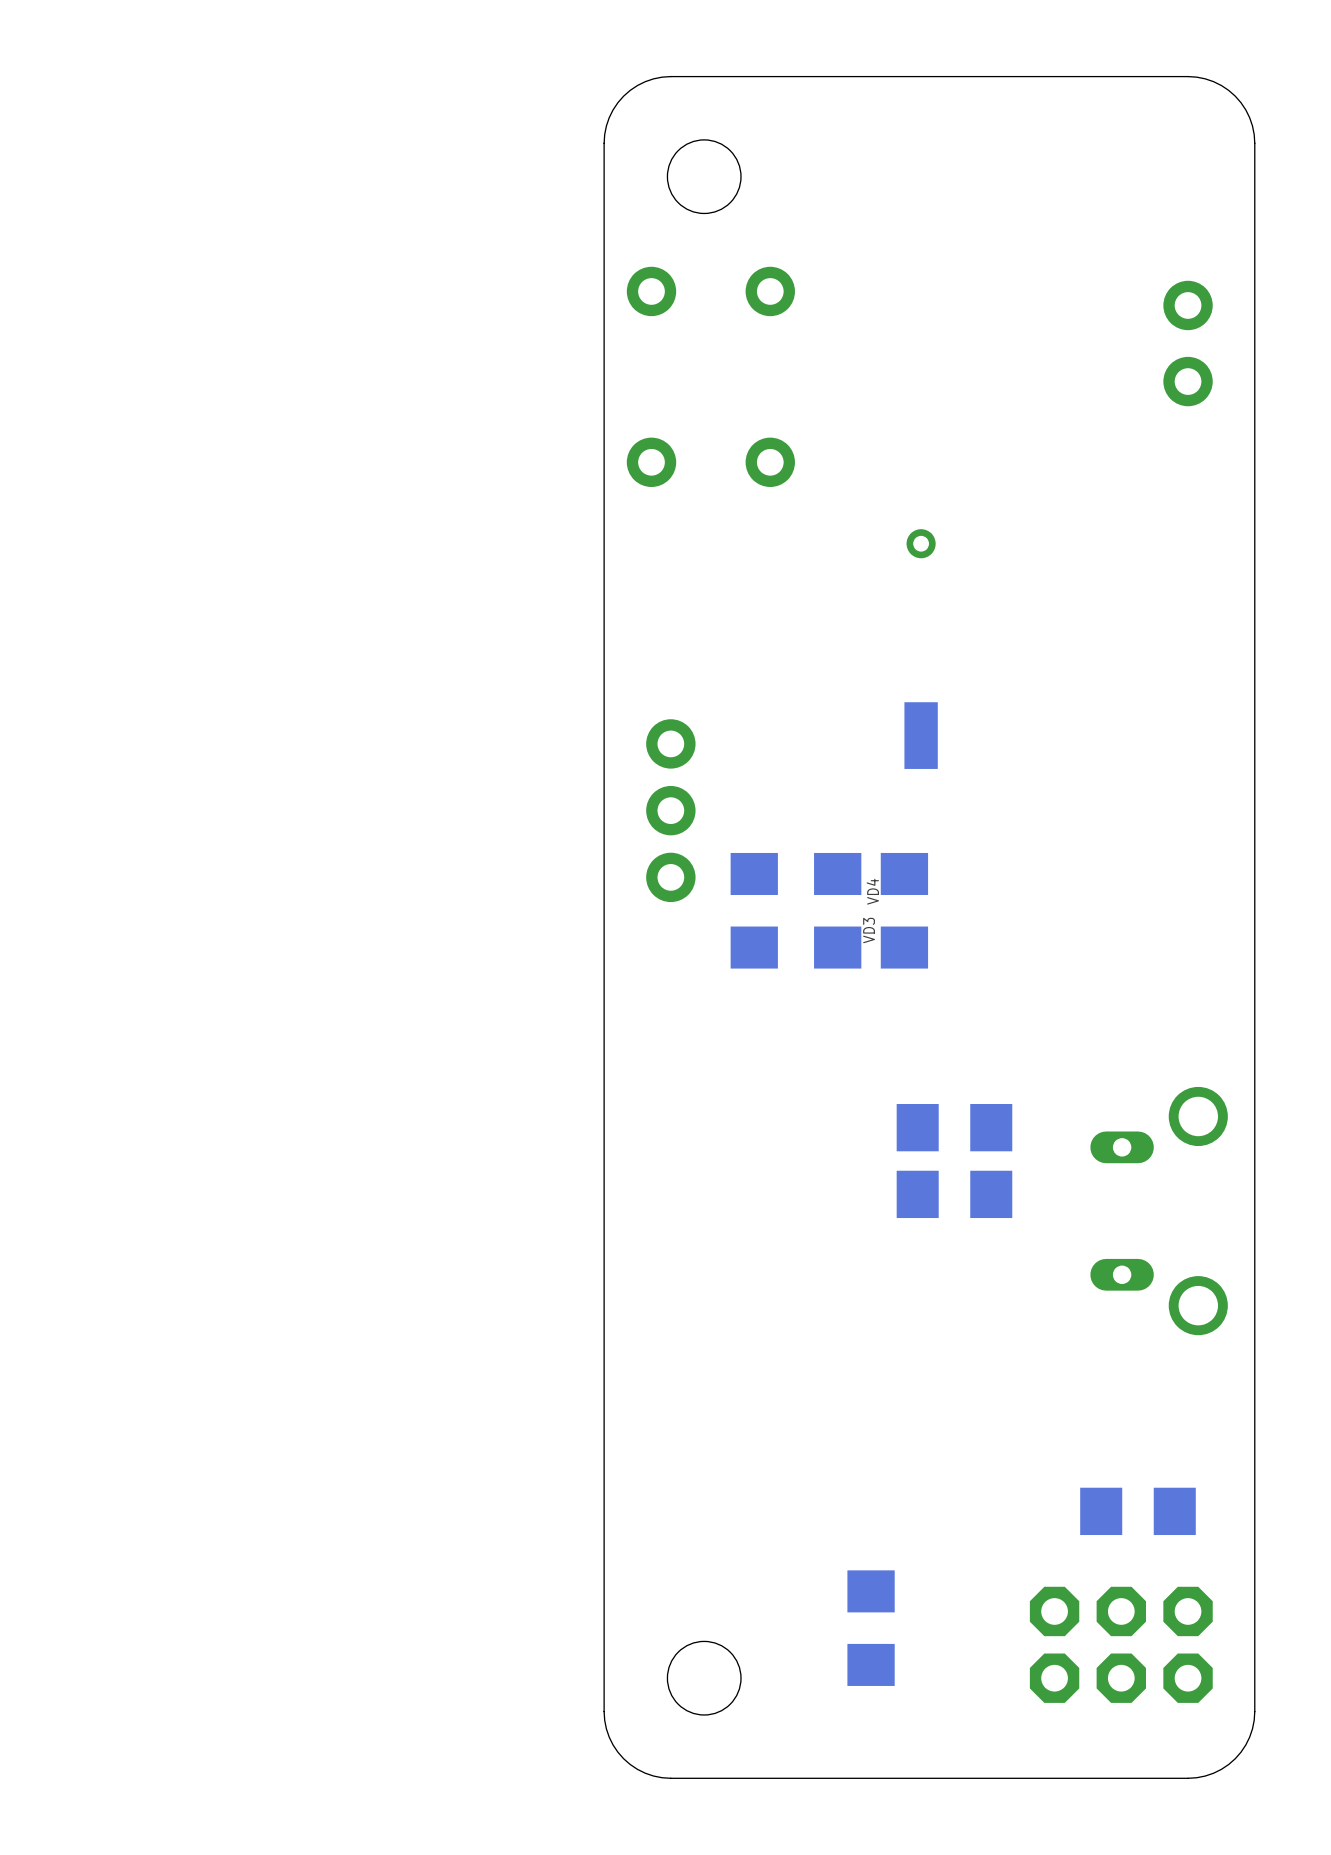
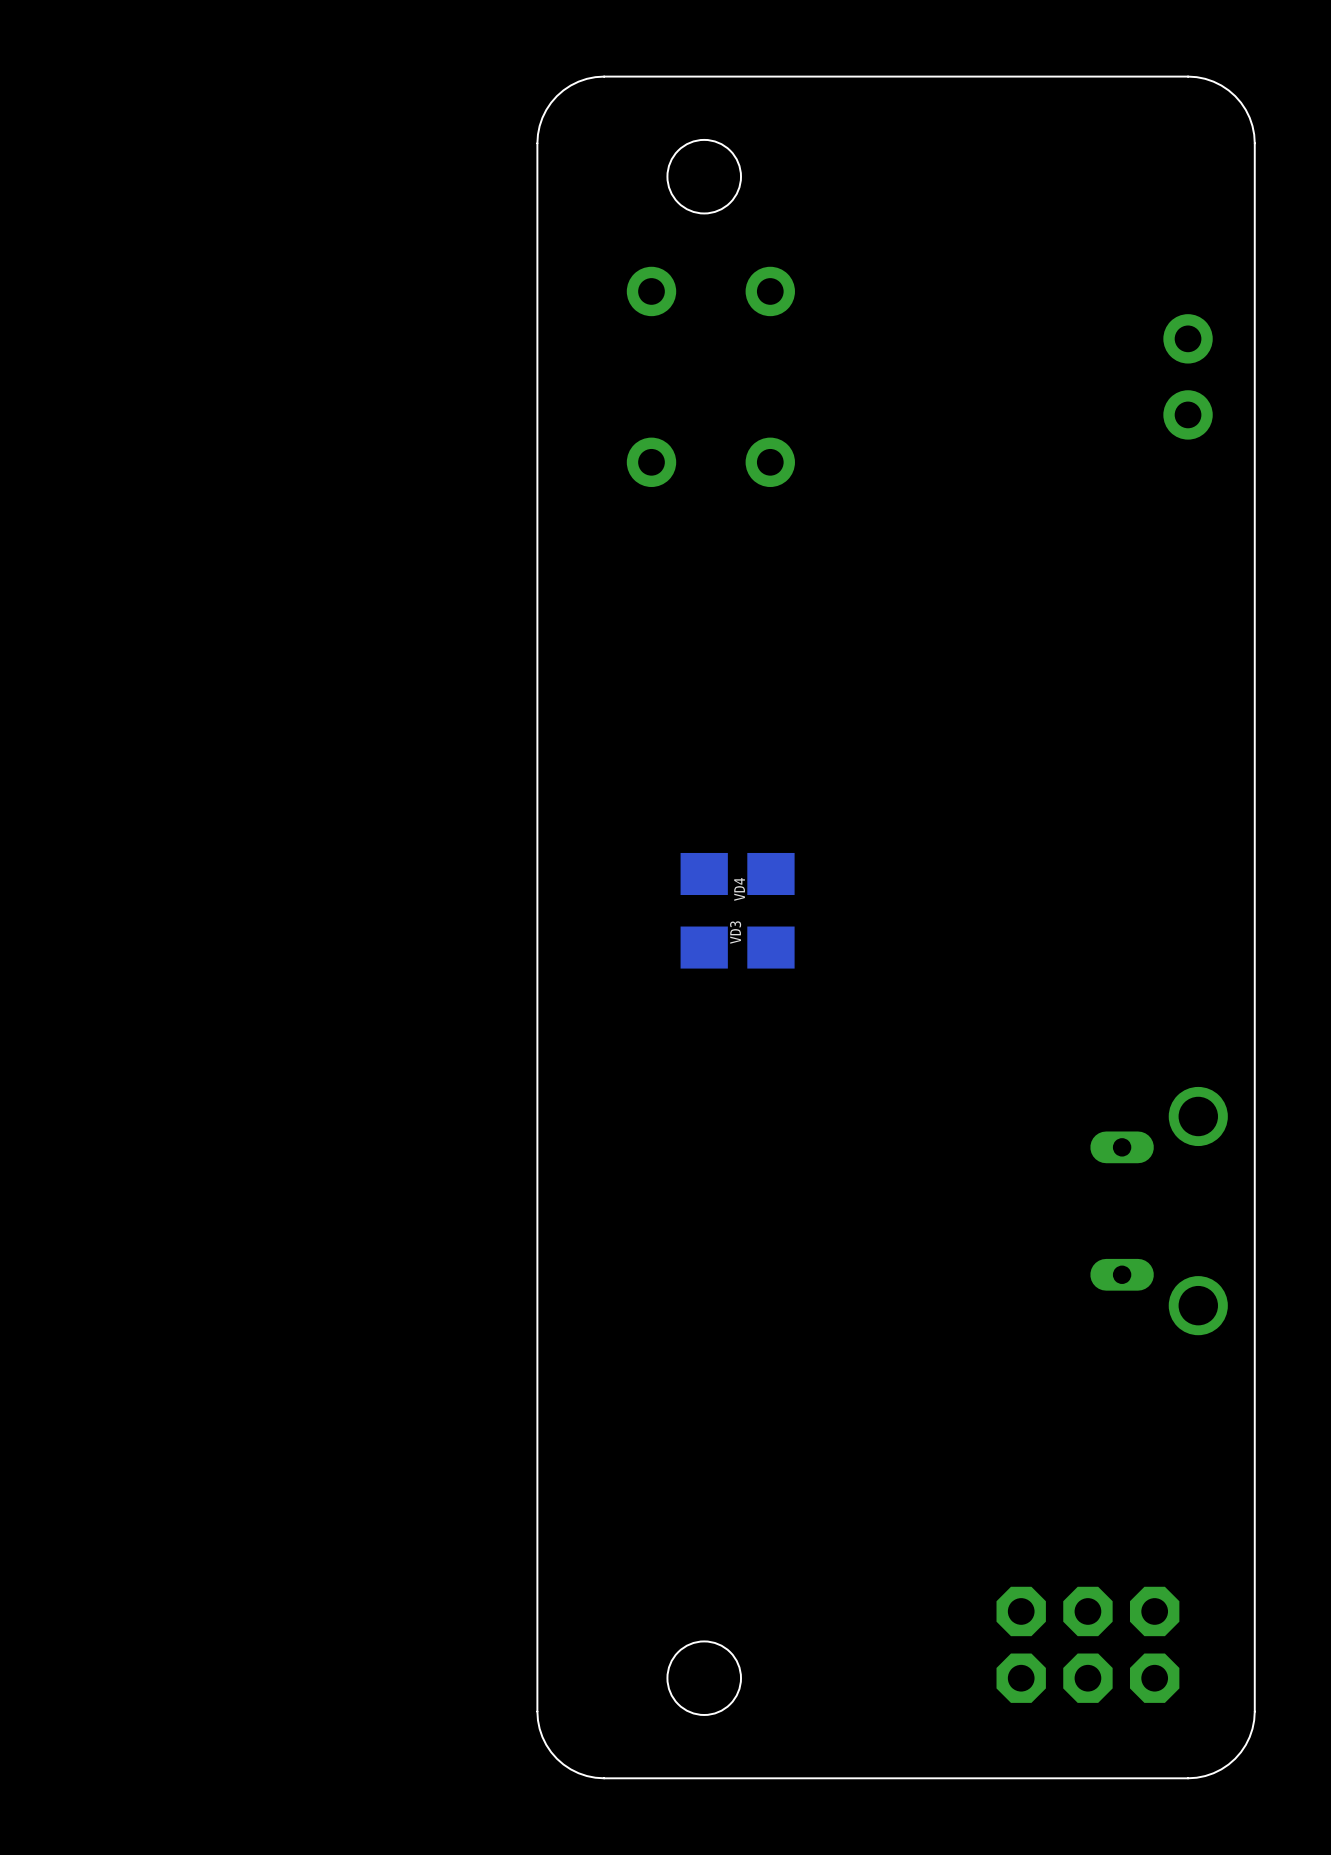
board edge: (670, 76) (645, 81) (623, 96) (609, 117) (604, 143) (604, 1711) (609, 1737) (623, 1758) (645, 1773) (670, 1778) -> (670, 76) (595, 77) (570, 85) (556, 96) (546, 109) (539, 126) (537, 143) (537, 1720) (542, 1737) (551, 1752) (563, 1764) (578, 1773) (604, 1778) (670, 1778)
part position: (1188, 343) -> (1188, 376)
part: (921, 543) -> none
part: (921, 735) -> none
part: (670, 810) -> none
part: (754, 910) -> none
VD4 position: (837, 910) -> (704, 910)
VD3 position: (904, 910) -> (770, 910)
part: (954, 1127) -> none
part: (954, 1194) -> none
part: (1137, 1511) -> none
part: (871, 1628) -> none
part position: (1121, 1644) -> (1087, 1644)

